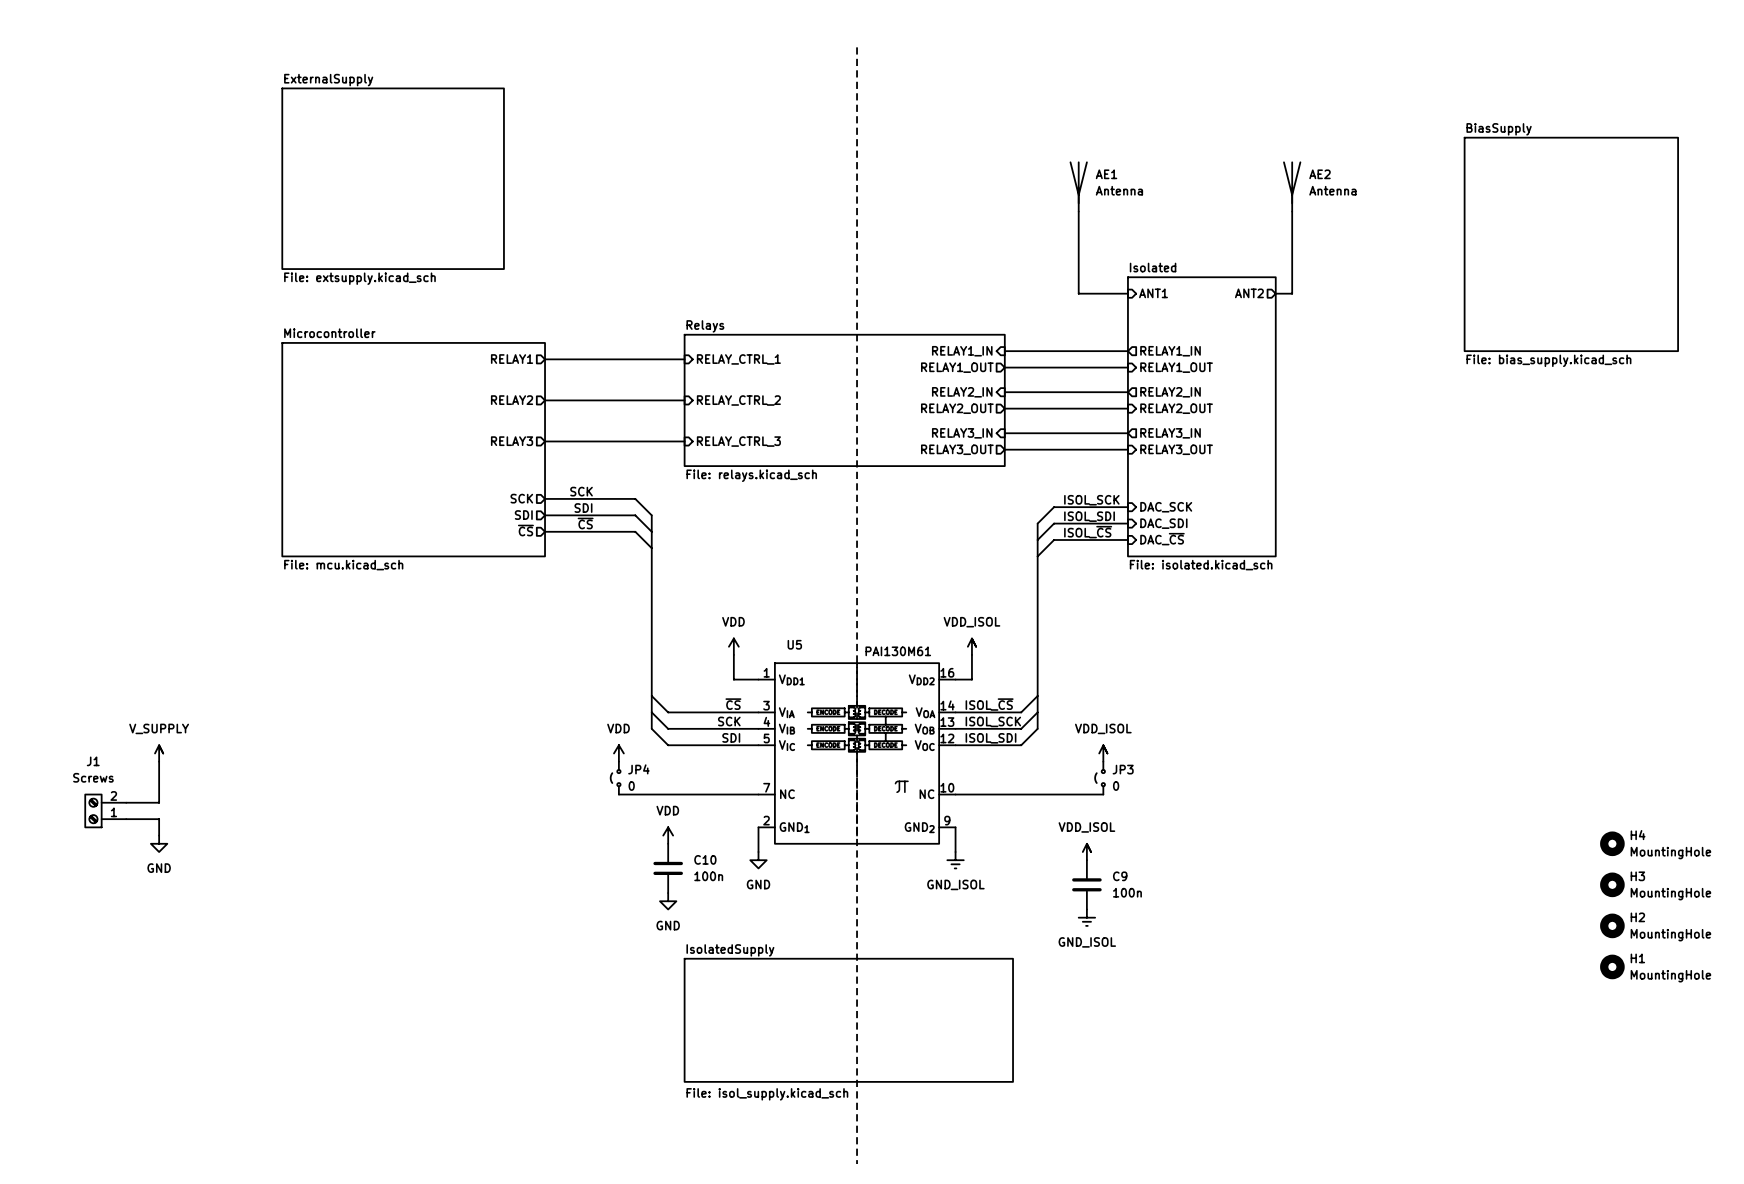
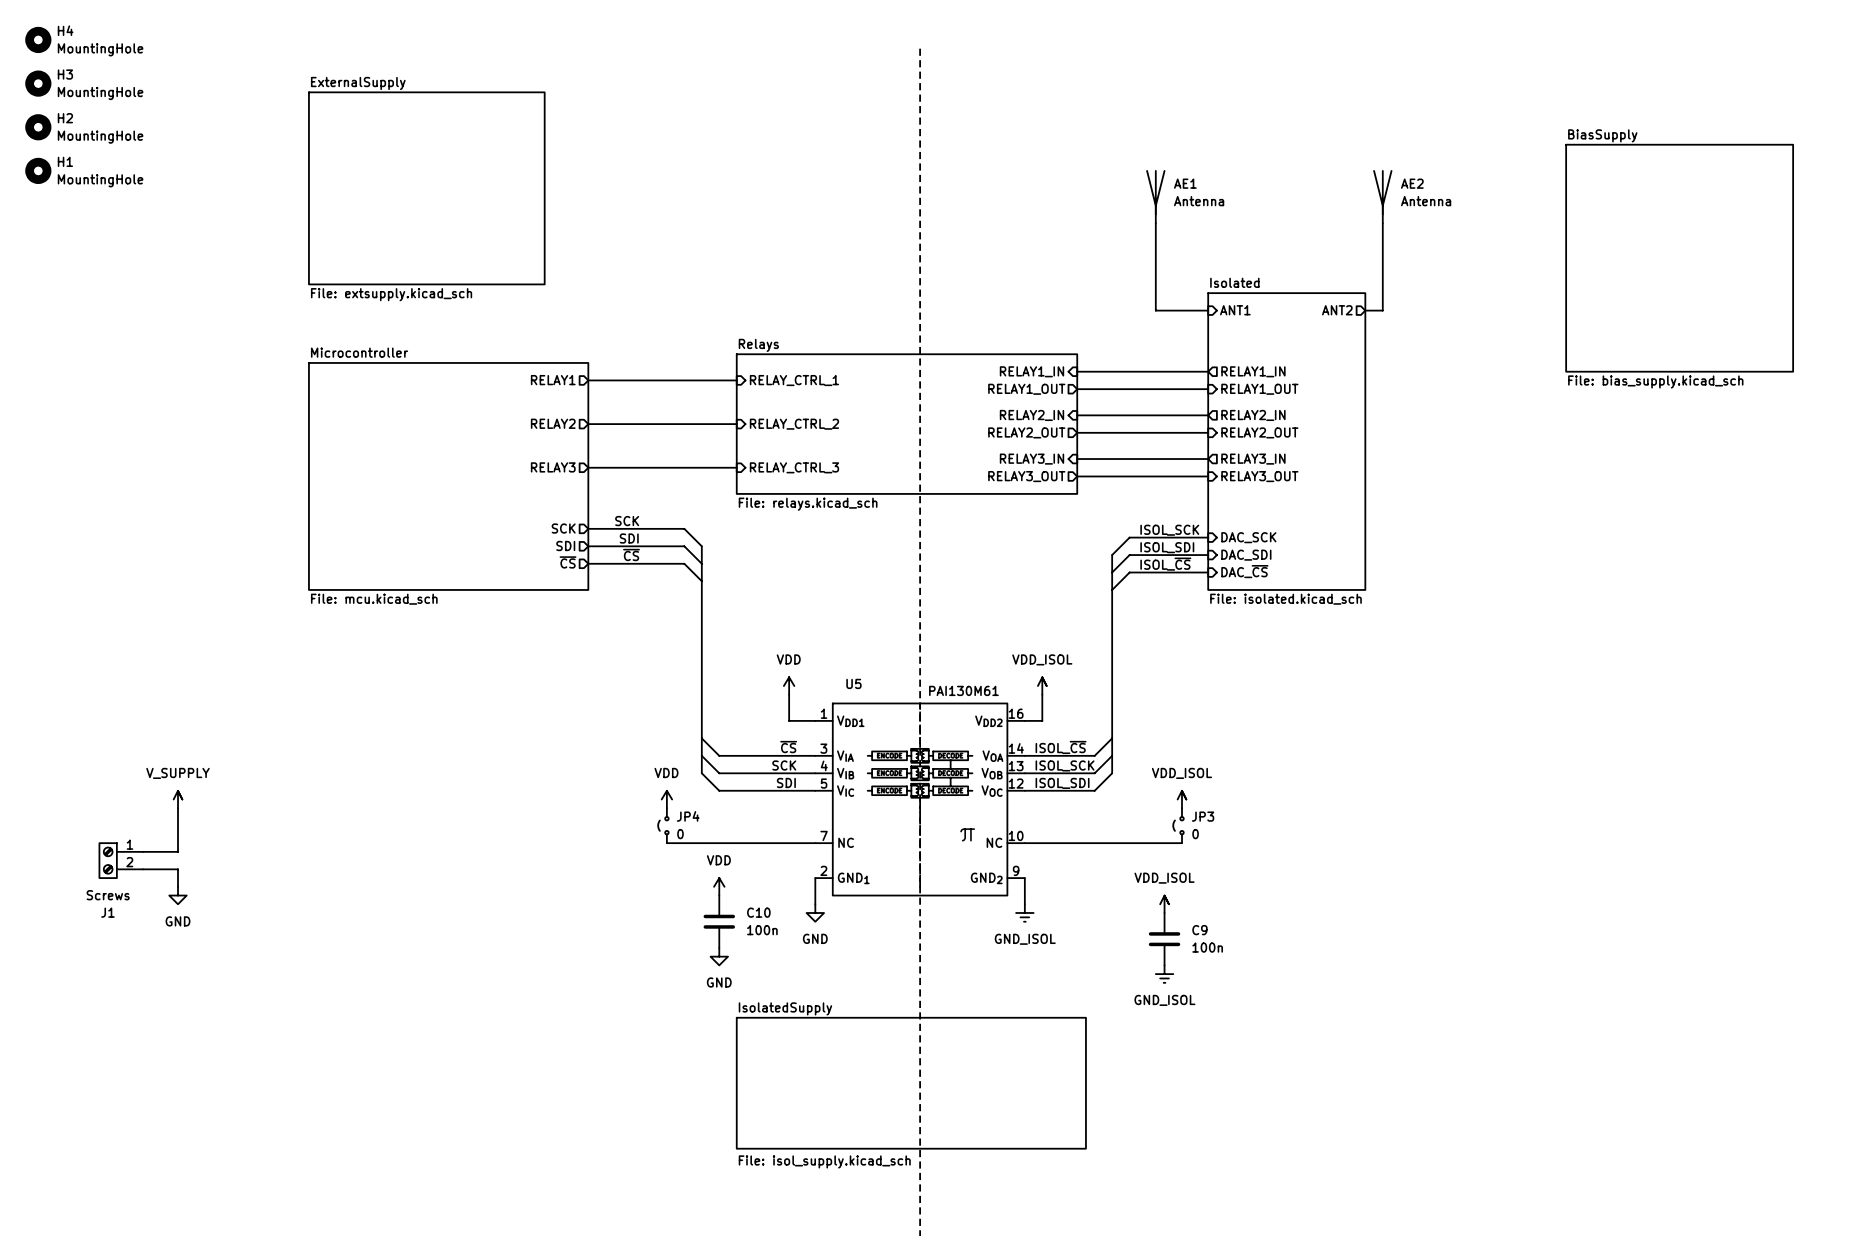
J1 flip: as is (93, 810) -> up-down (108, 860)
H4 position: (1612, 843) -> (38, 39)
H3 position: (1612, 884) -> (38, 83)
H2 position: (1612, 925) -> (38, 127)
H1 position: (1612, 966) -> (38, 170)

